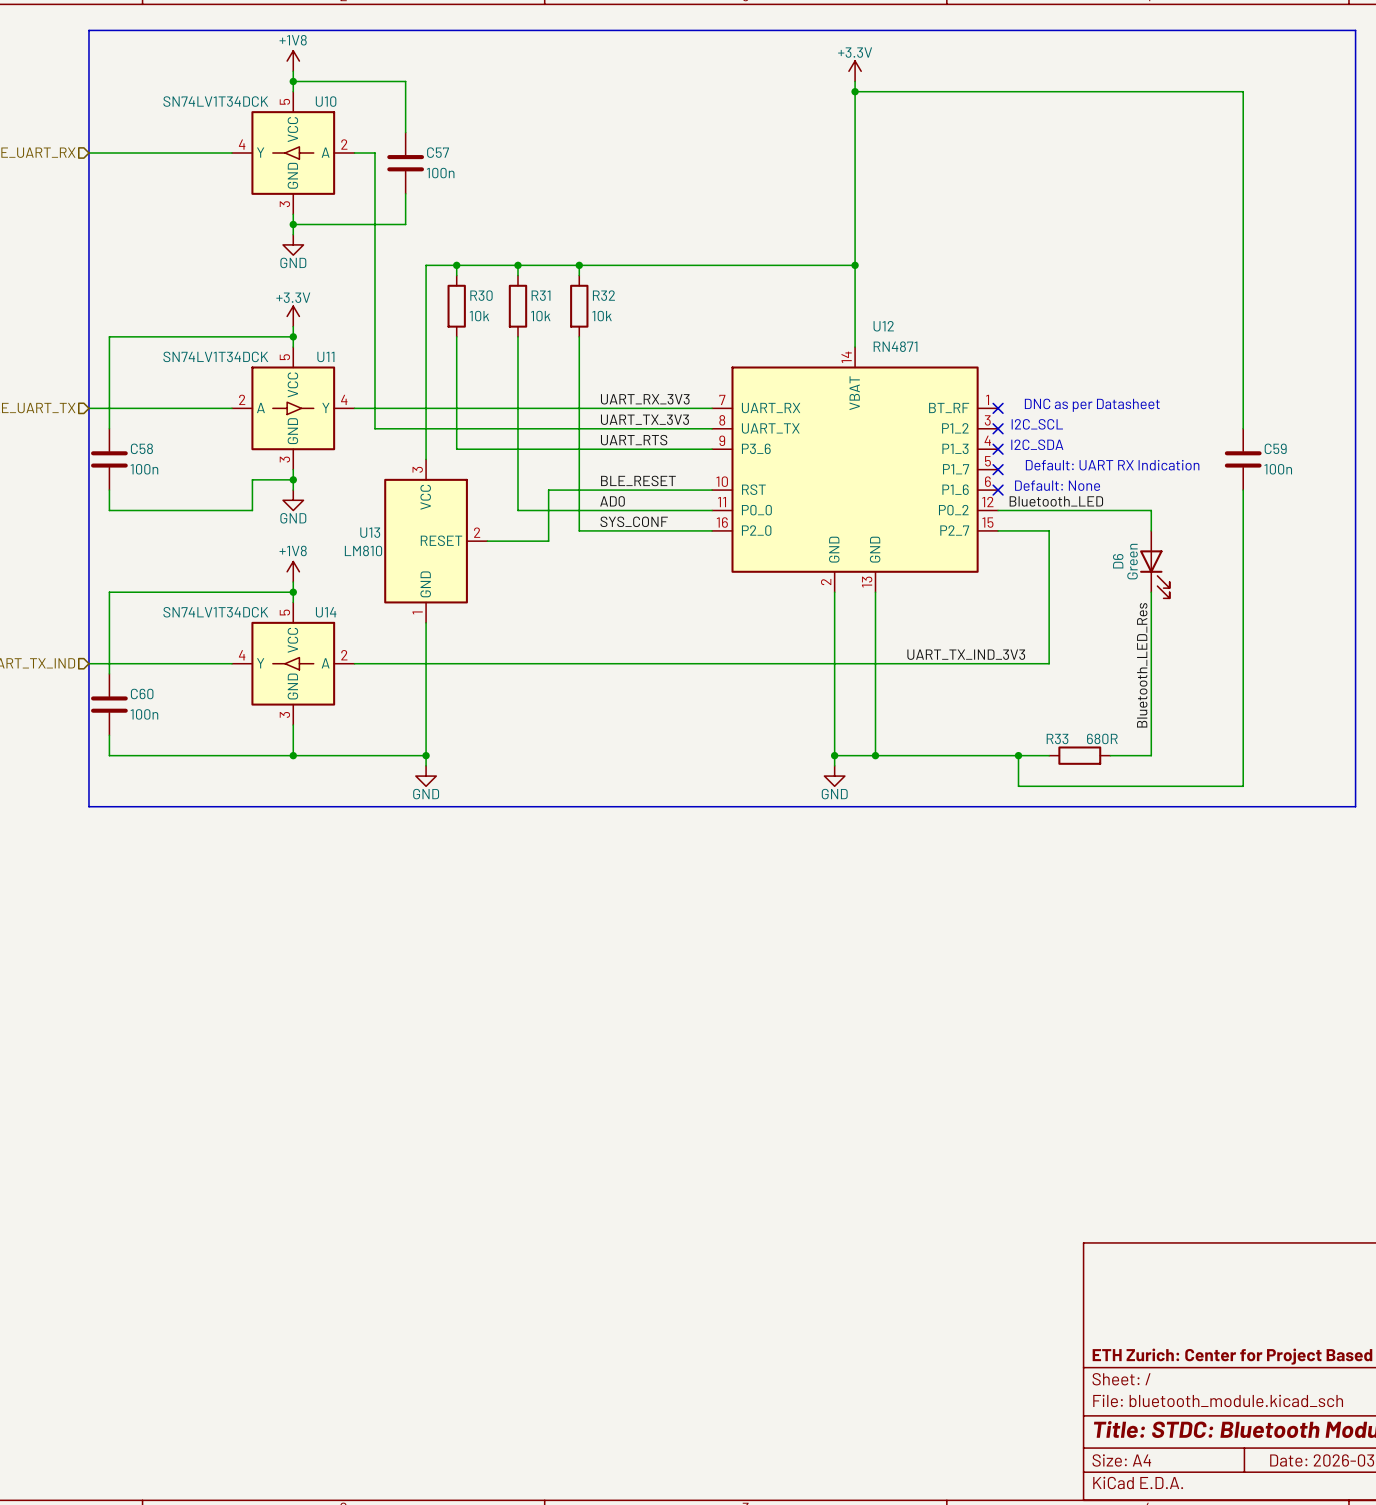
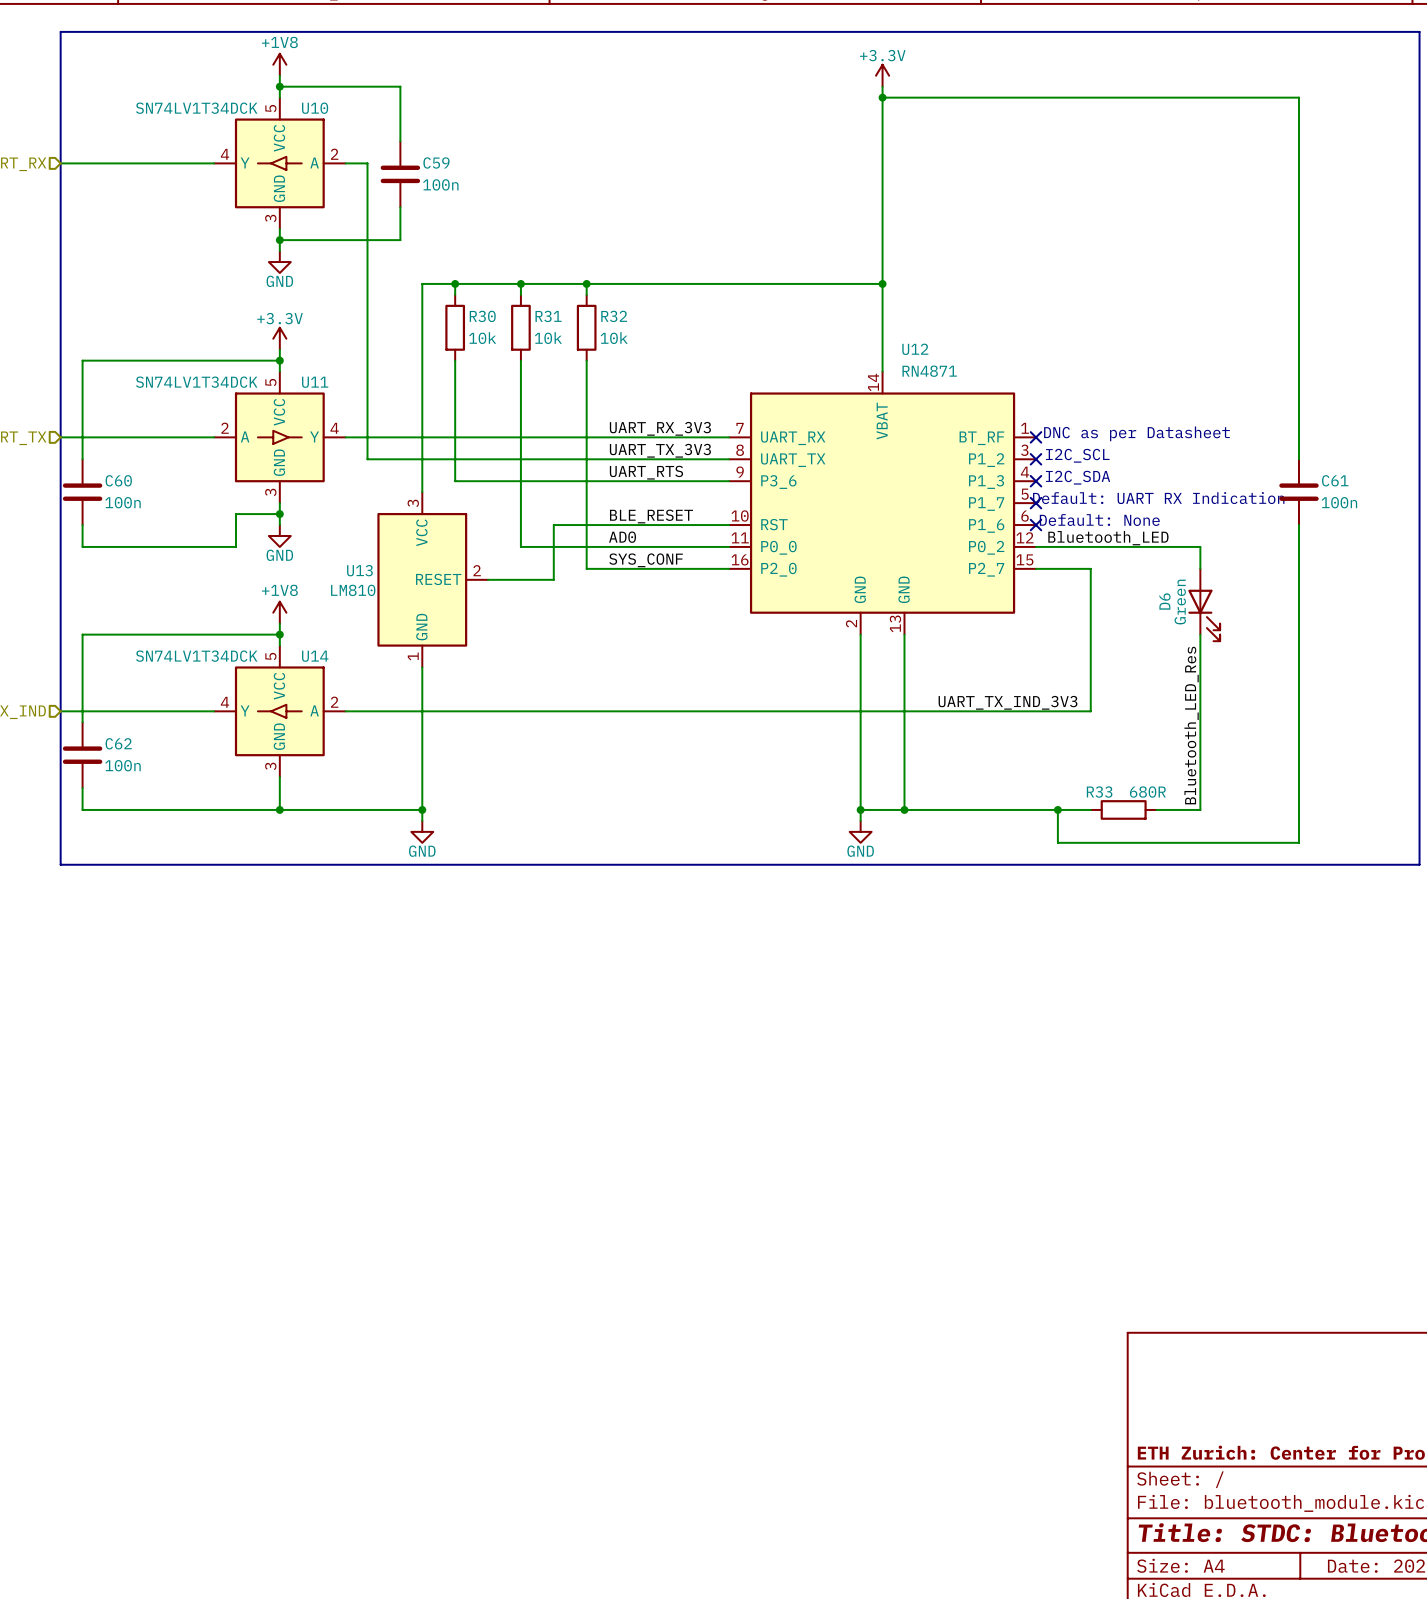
C57 name: C57 (438, 152) -> C59 (436, 162)
C58 name: C58 (141, 448) -> C60 (118, 480)
C59 name: C59 (1275, 448) -> C61 (1335, 480)
C60 name: C60 (142, 693) -> C62 (118, 743)

